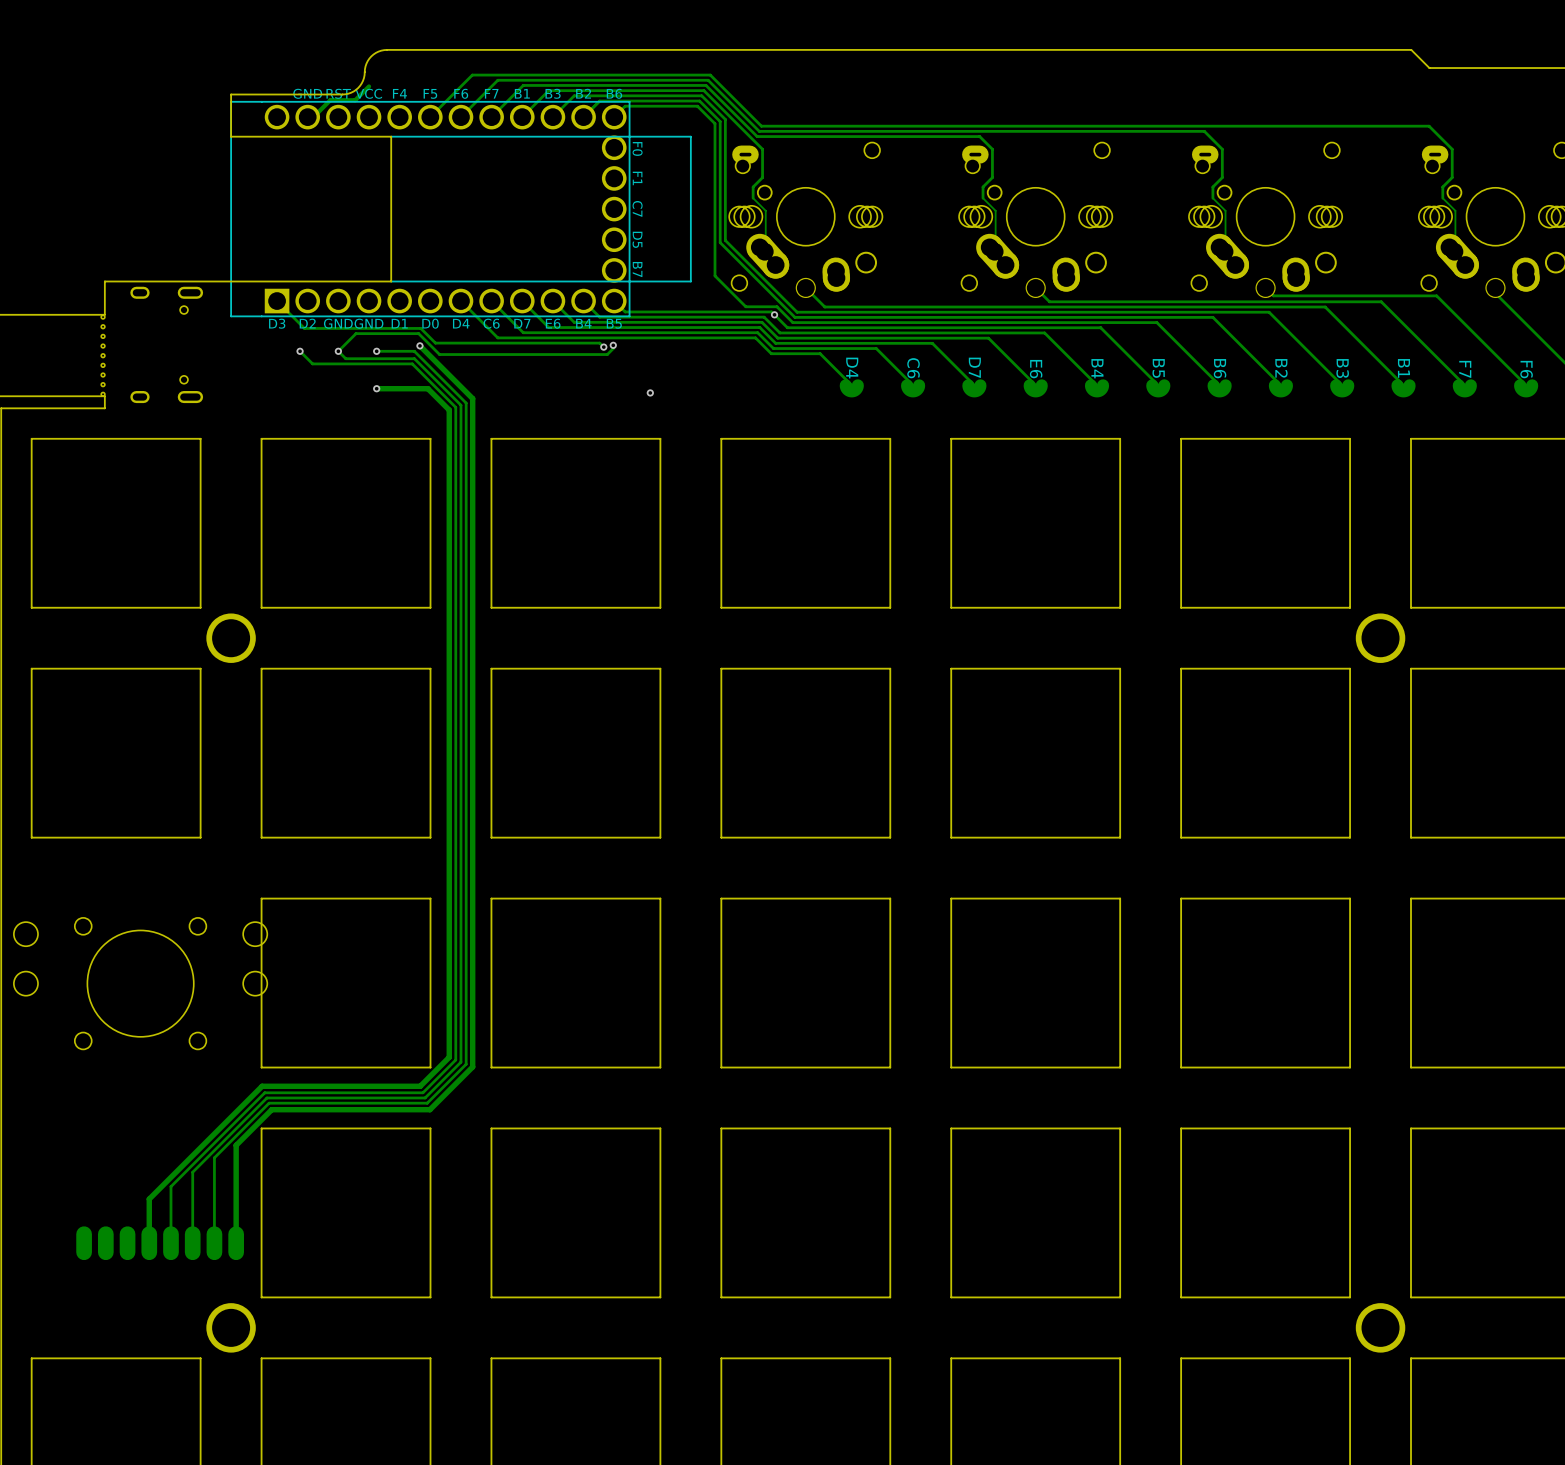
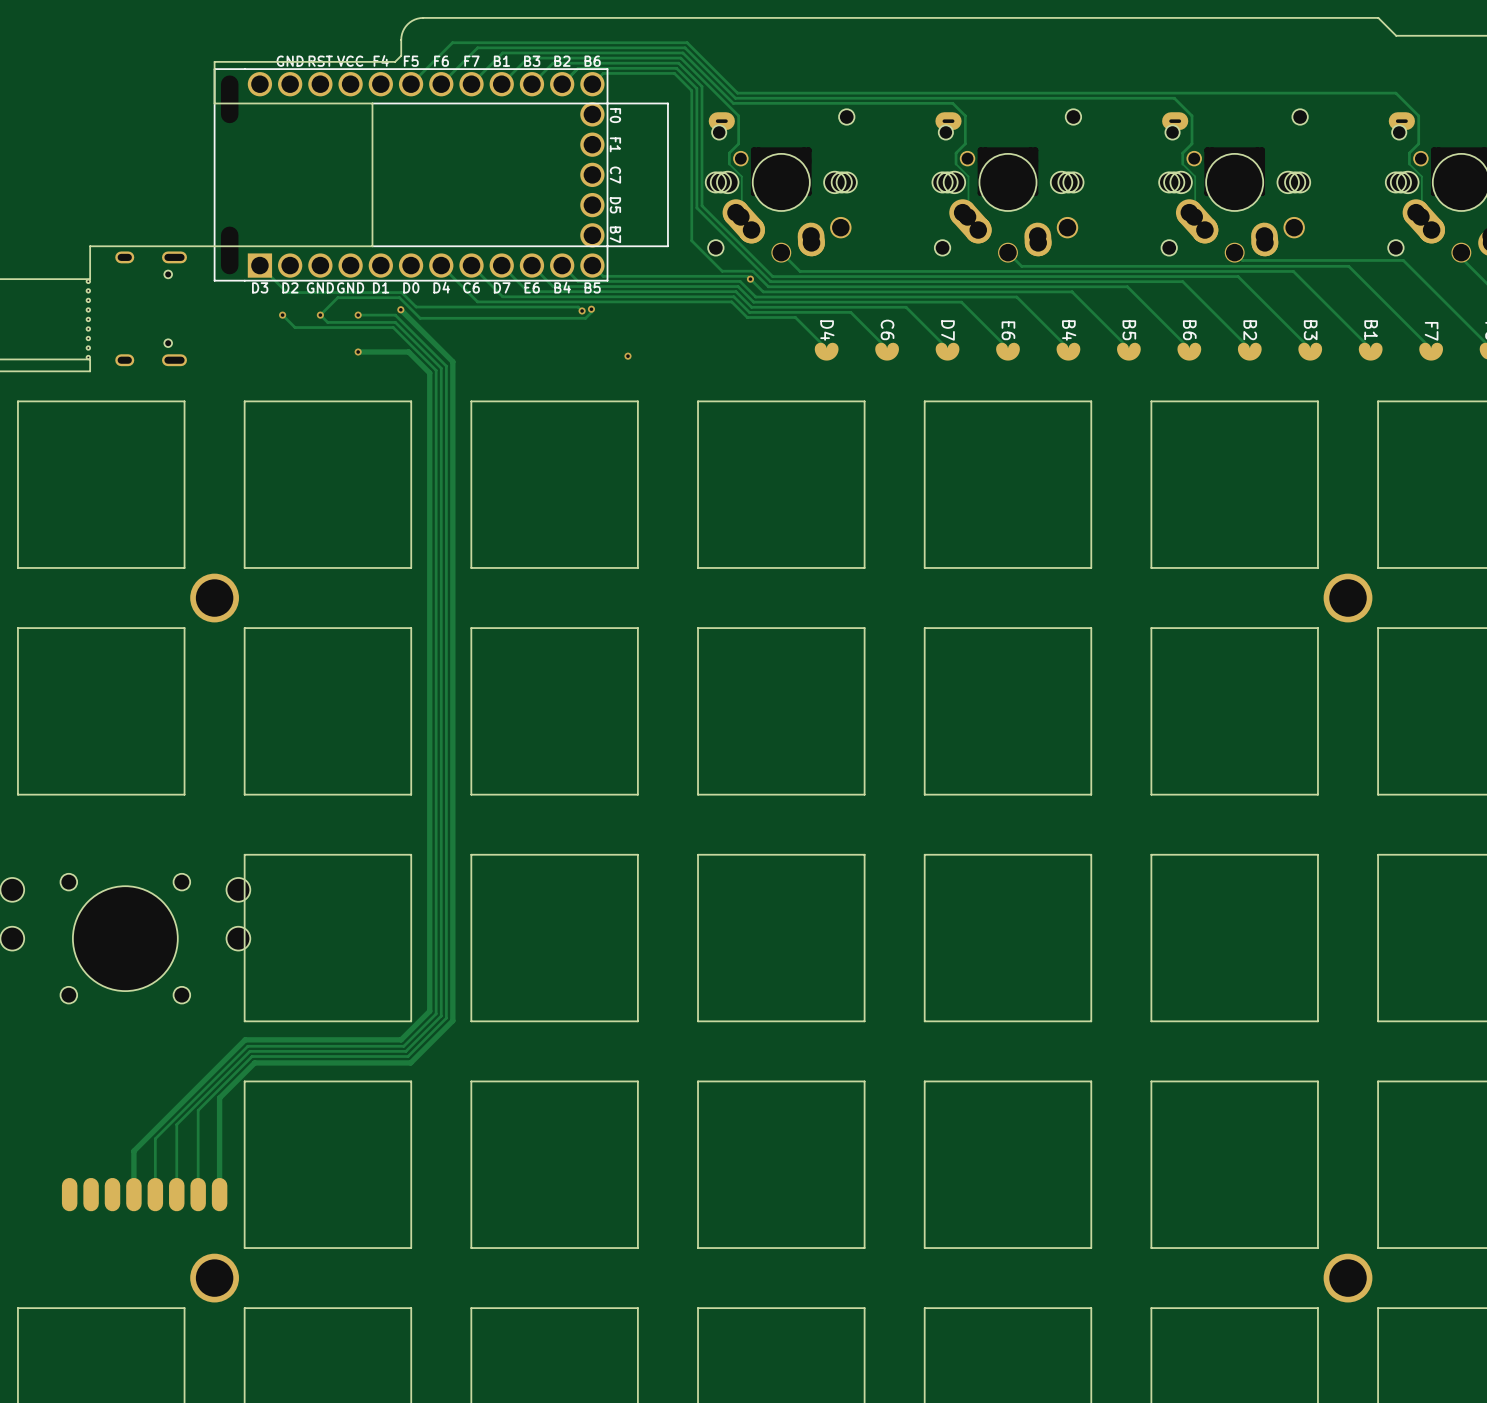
board edge: (1411, 49) (387, 49) (378, 51) (369, 58) (365, 66) (363, 80) (358, 87) (351, 92) (342, 94) -> (1378, 17) (423, 17) (412, 20) (404, 28) (401, 37) (401, 55) (395, 61) (324, 61)
track: (369, 86) (355, 100) (330, 100) (313, 117) -> none

